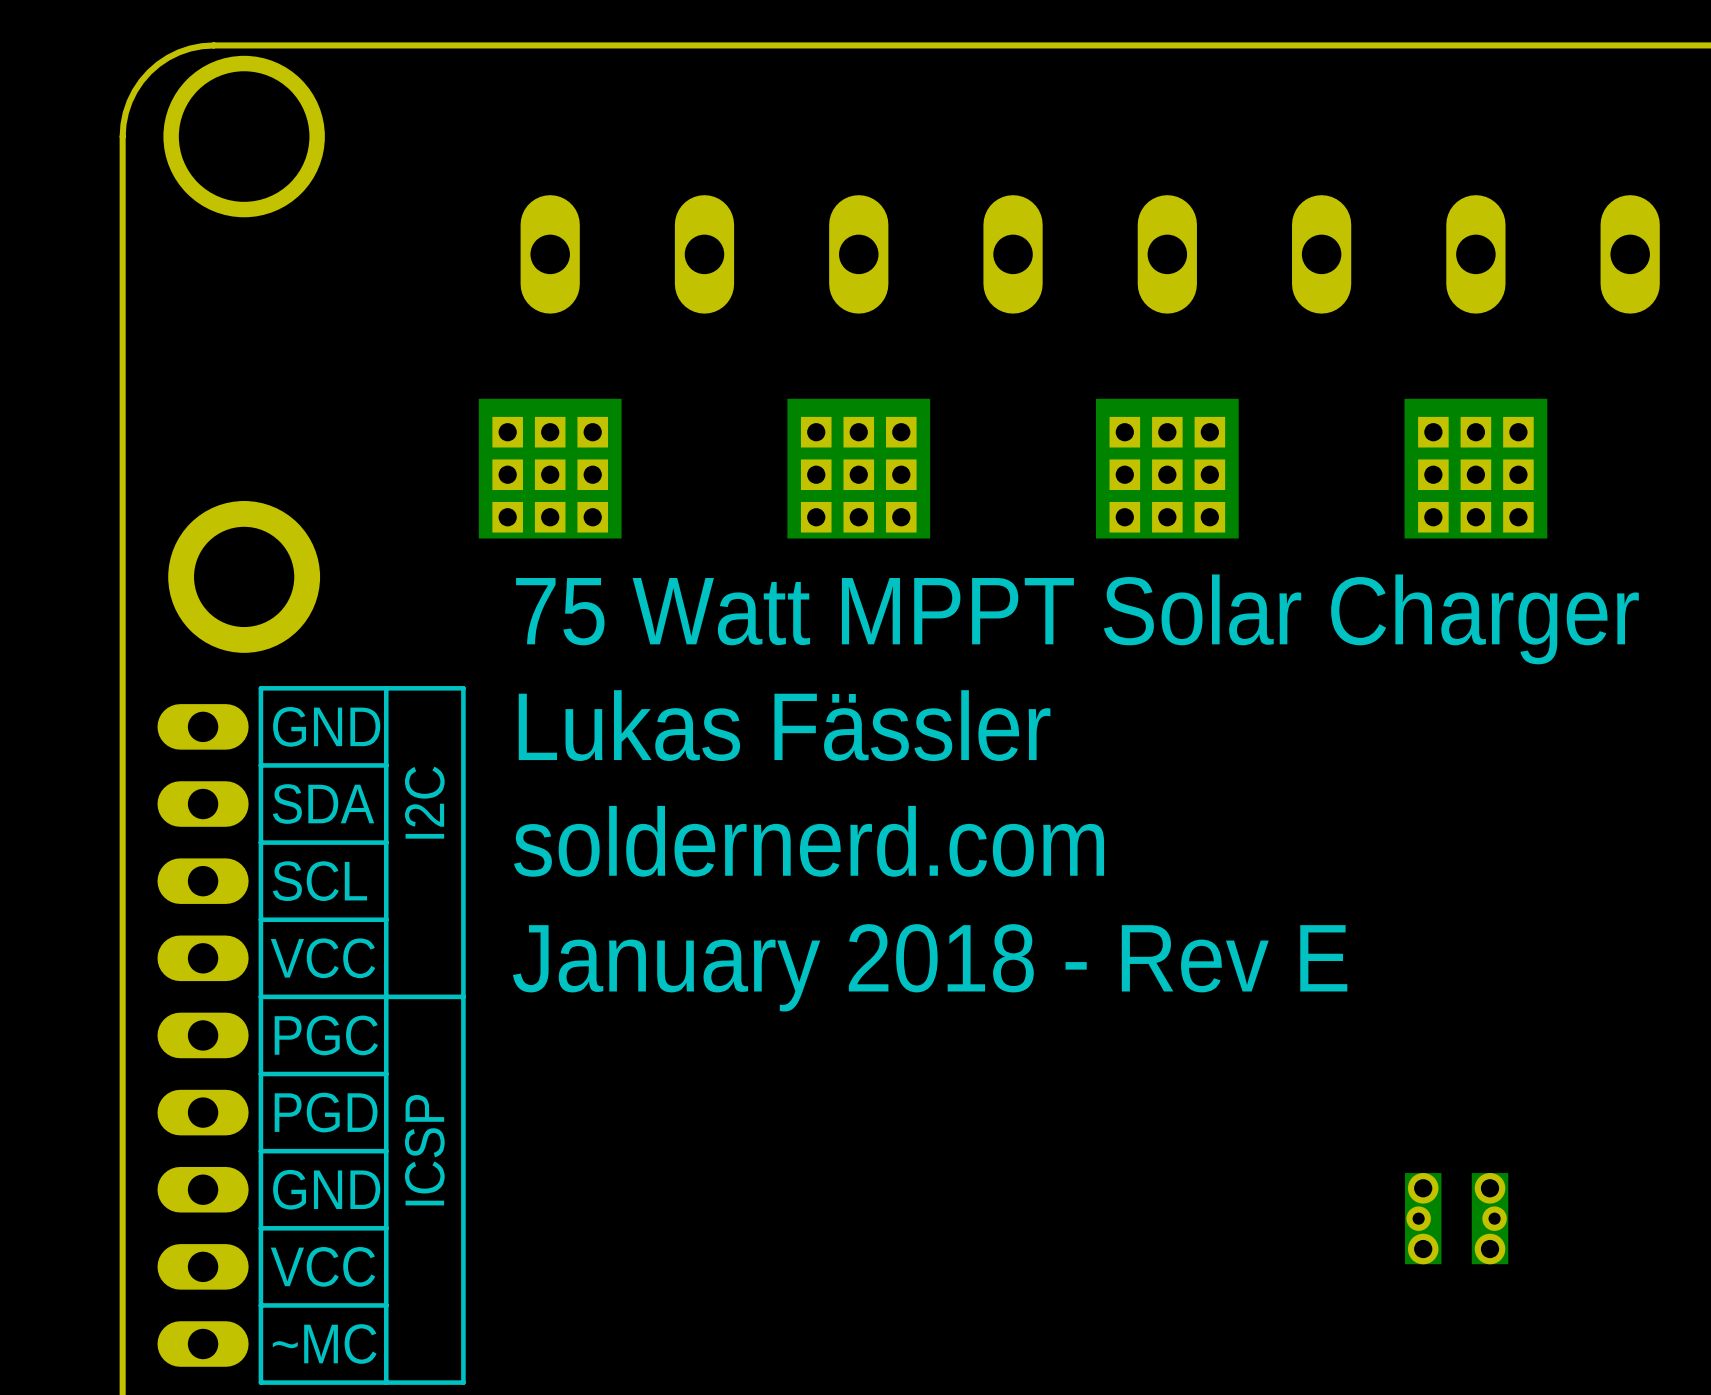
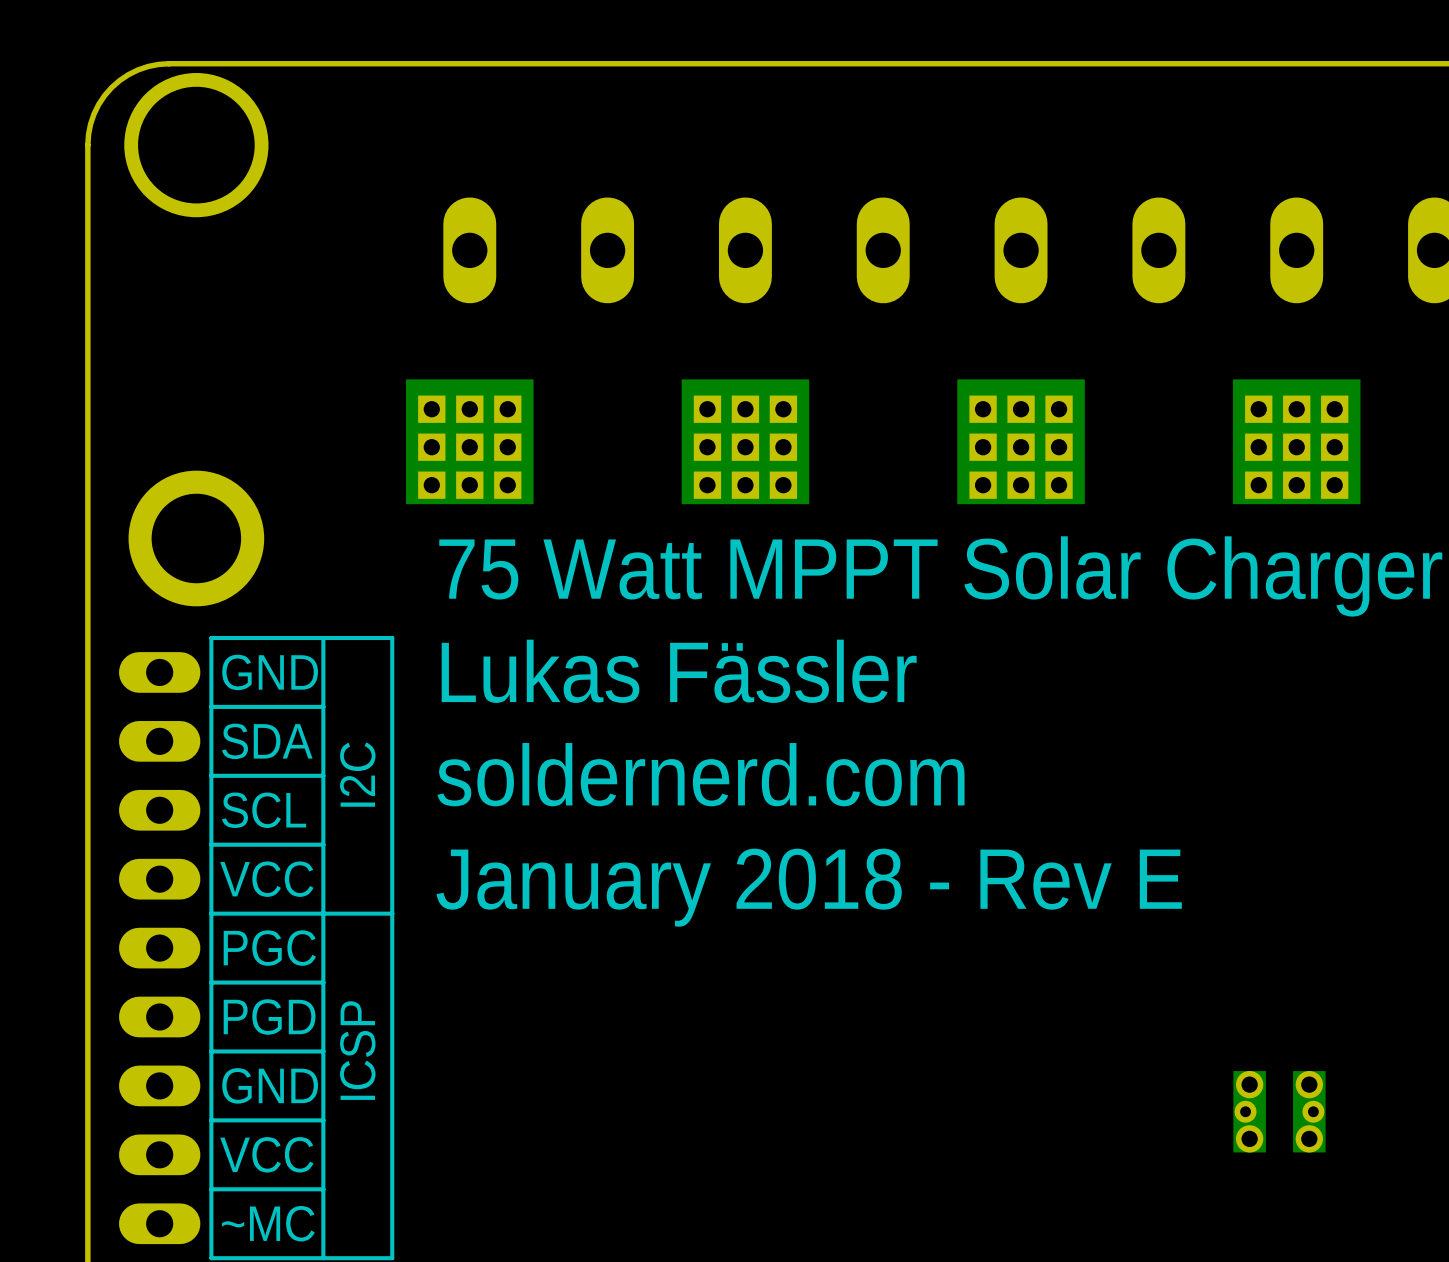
text position: I2C (424, 802) -> I2C (357, 774)

